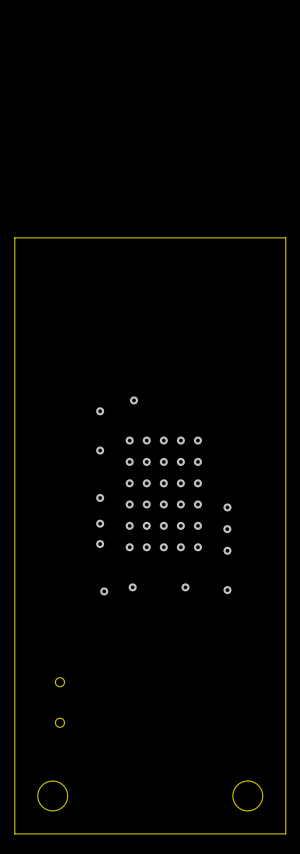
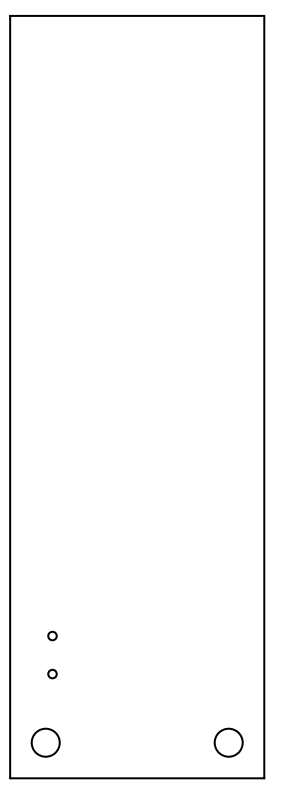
board edge: (285, 237) (14, 237) -> (264, 219) (264, 15) (10, 15) (10, 219)
via: (134, 400) -> none
via: (100, 411) -> none
via: (129, 440) -> none
via: (146, 440) -> none
via: (163, 440) -> none
via: (180, 440) -> none
via: (197, 440) -> none
via: (100, 450) -> none
via: (129, 461) -> none
via: (146, 461) -> none
via: (163, 461) -> none
via: (180, 461) -> none
via: (197, 461) -> none
via: (129, 483) -> none
via: (146, 483) -> none
via: (163, 483) -> none
via: (180, 483) -> none
via: (197, 483) -> none
via: (100, 497) -> none
via: (129, 504) -> none
via: (146, 504) -> none
via: (163, 504) -> none
via: (180, 504) -> none
via: (197, 504) -> none
via: (227, 507) -> none
via: (100, 523) -> none
via: (129, 525) -> none
via: (146, 525) -> none
via: (163, 525) -> none
via: (180, 525) -> none
via: (197, 525) -> none
via: (227, 529) -> none
via: (100, 544) -> none
via: (129, 547) -> none
via: (146, 547) -> none
via: (163, 547) -> none
via: (180, 547) -> none
via: (197, 547) -> none
via: (227, 550) -> none
via: (132, 587) -> none
via: (185, 587) -> none
via: (227, 590) -> none
via: (104, 591) -> none

